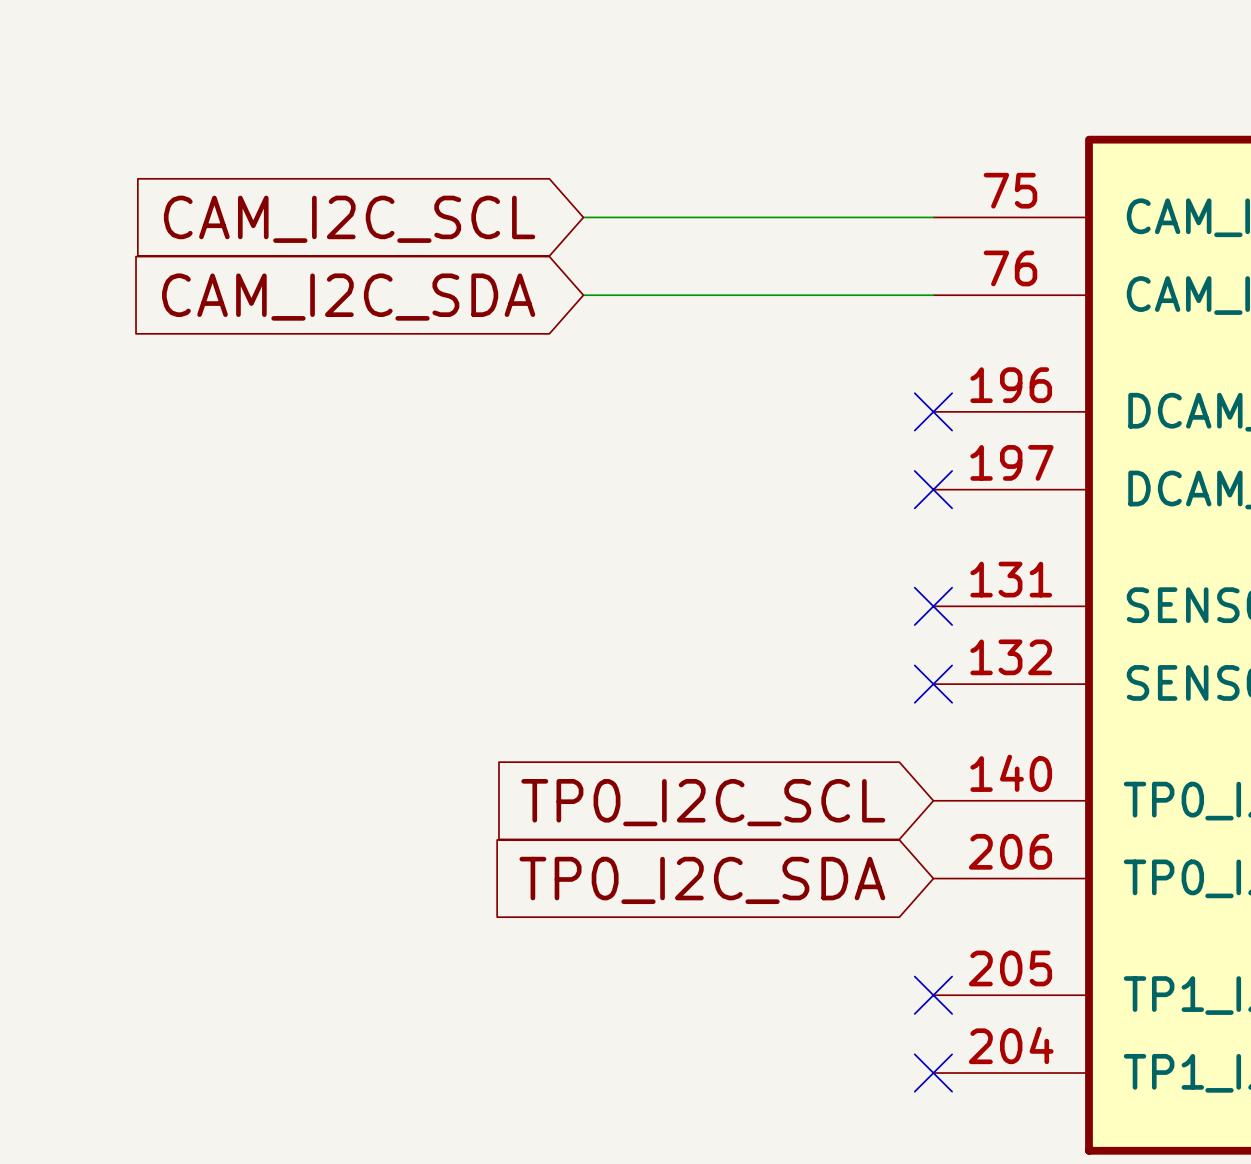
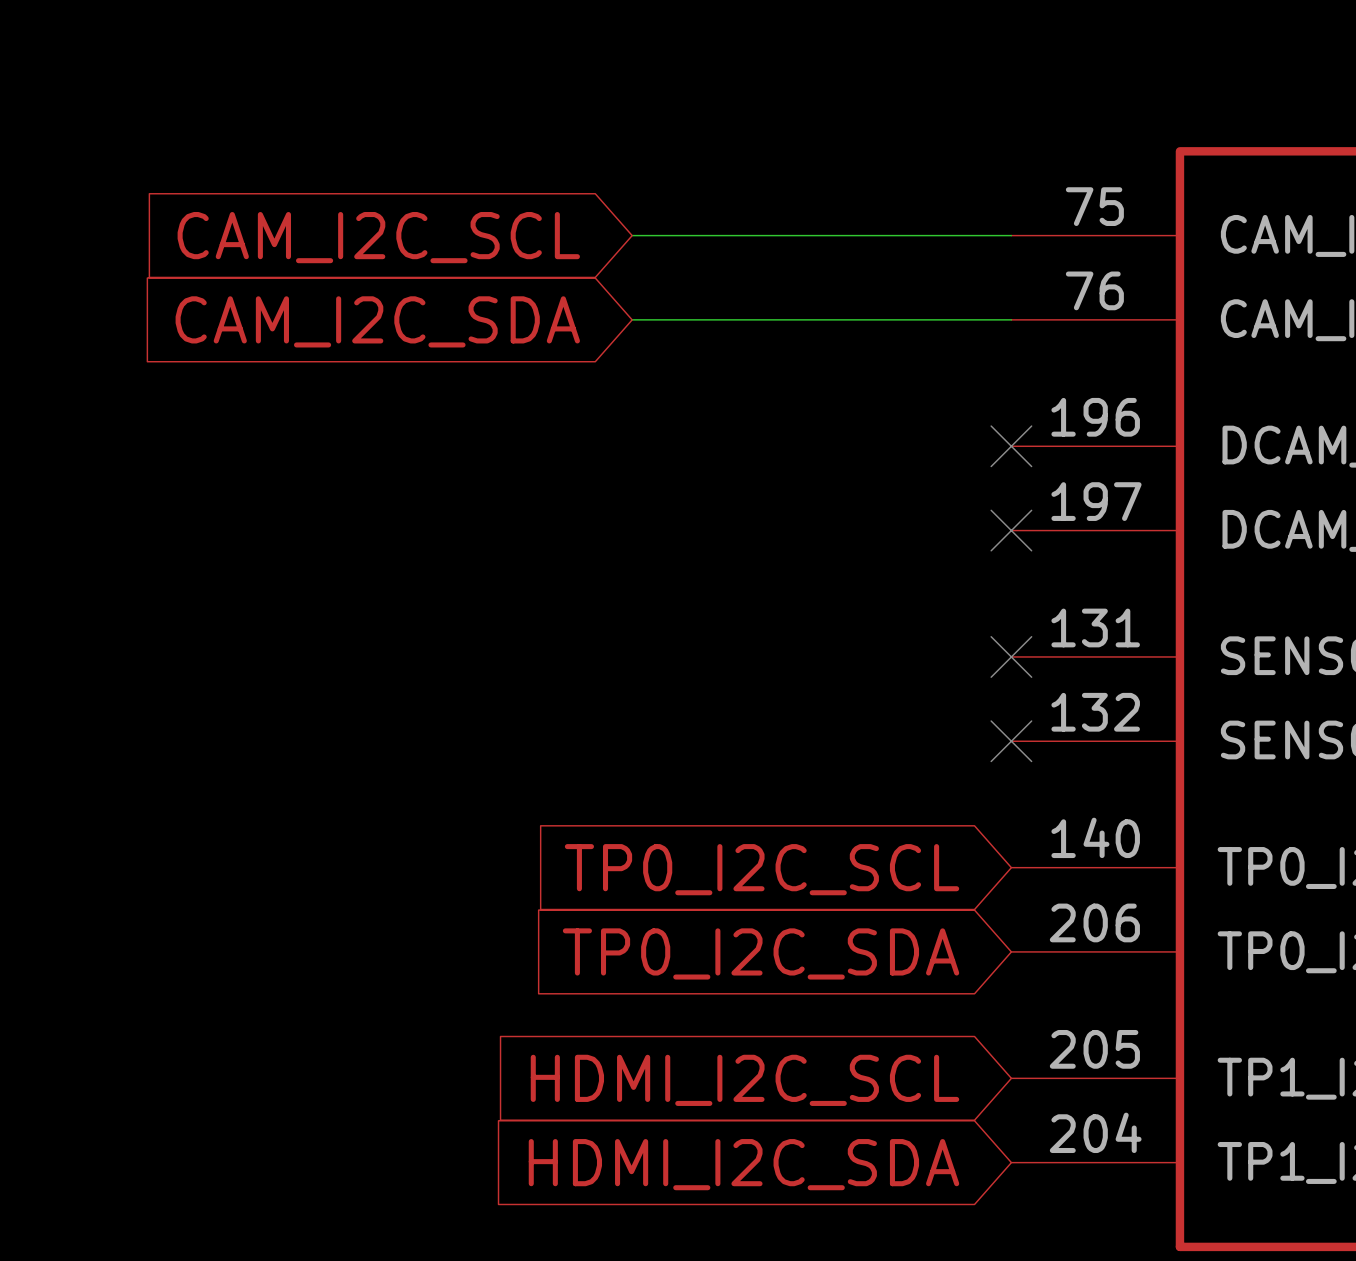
no-connect mark: (933, 995) -> none
global label: none -> HDMI_I2C_SCL (744, 1080)
no-connect mark: (933, 1073) -> none
global label: none -> HDMI_I2C_SDA (743, 1164)

